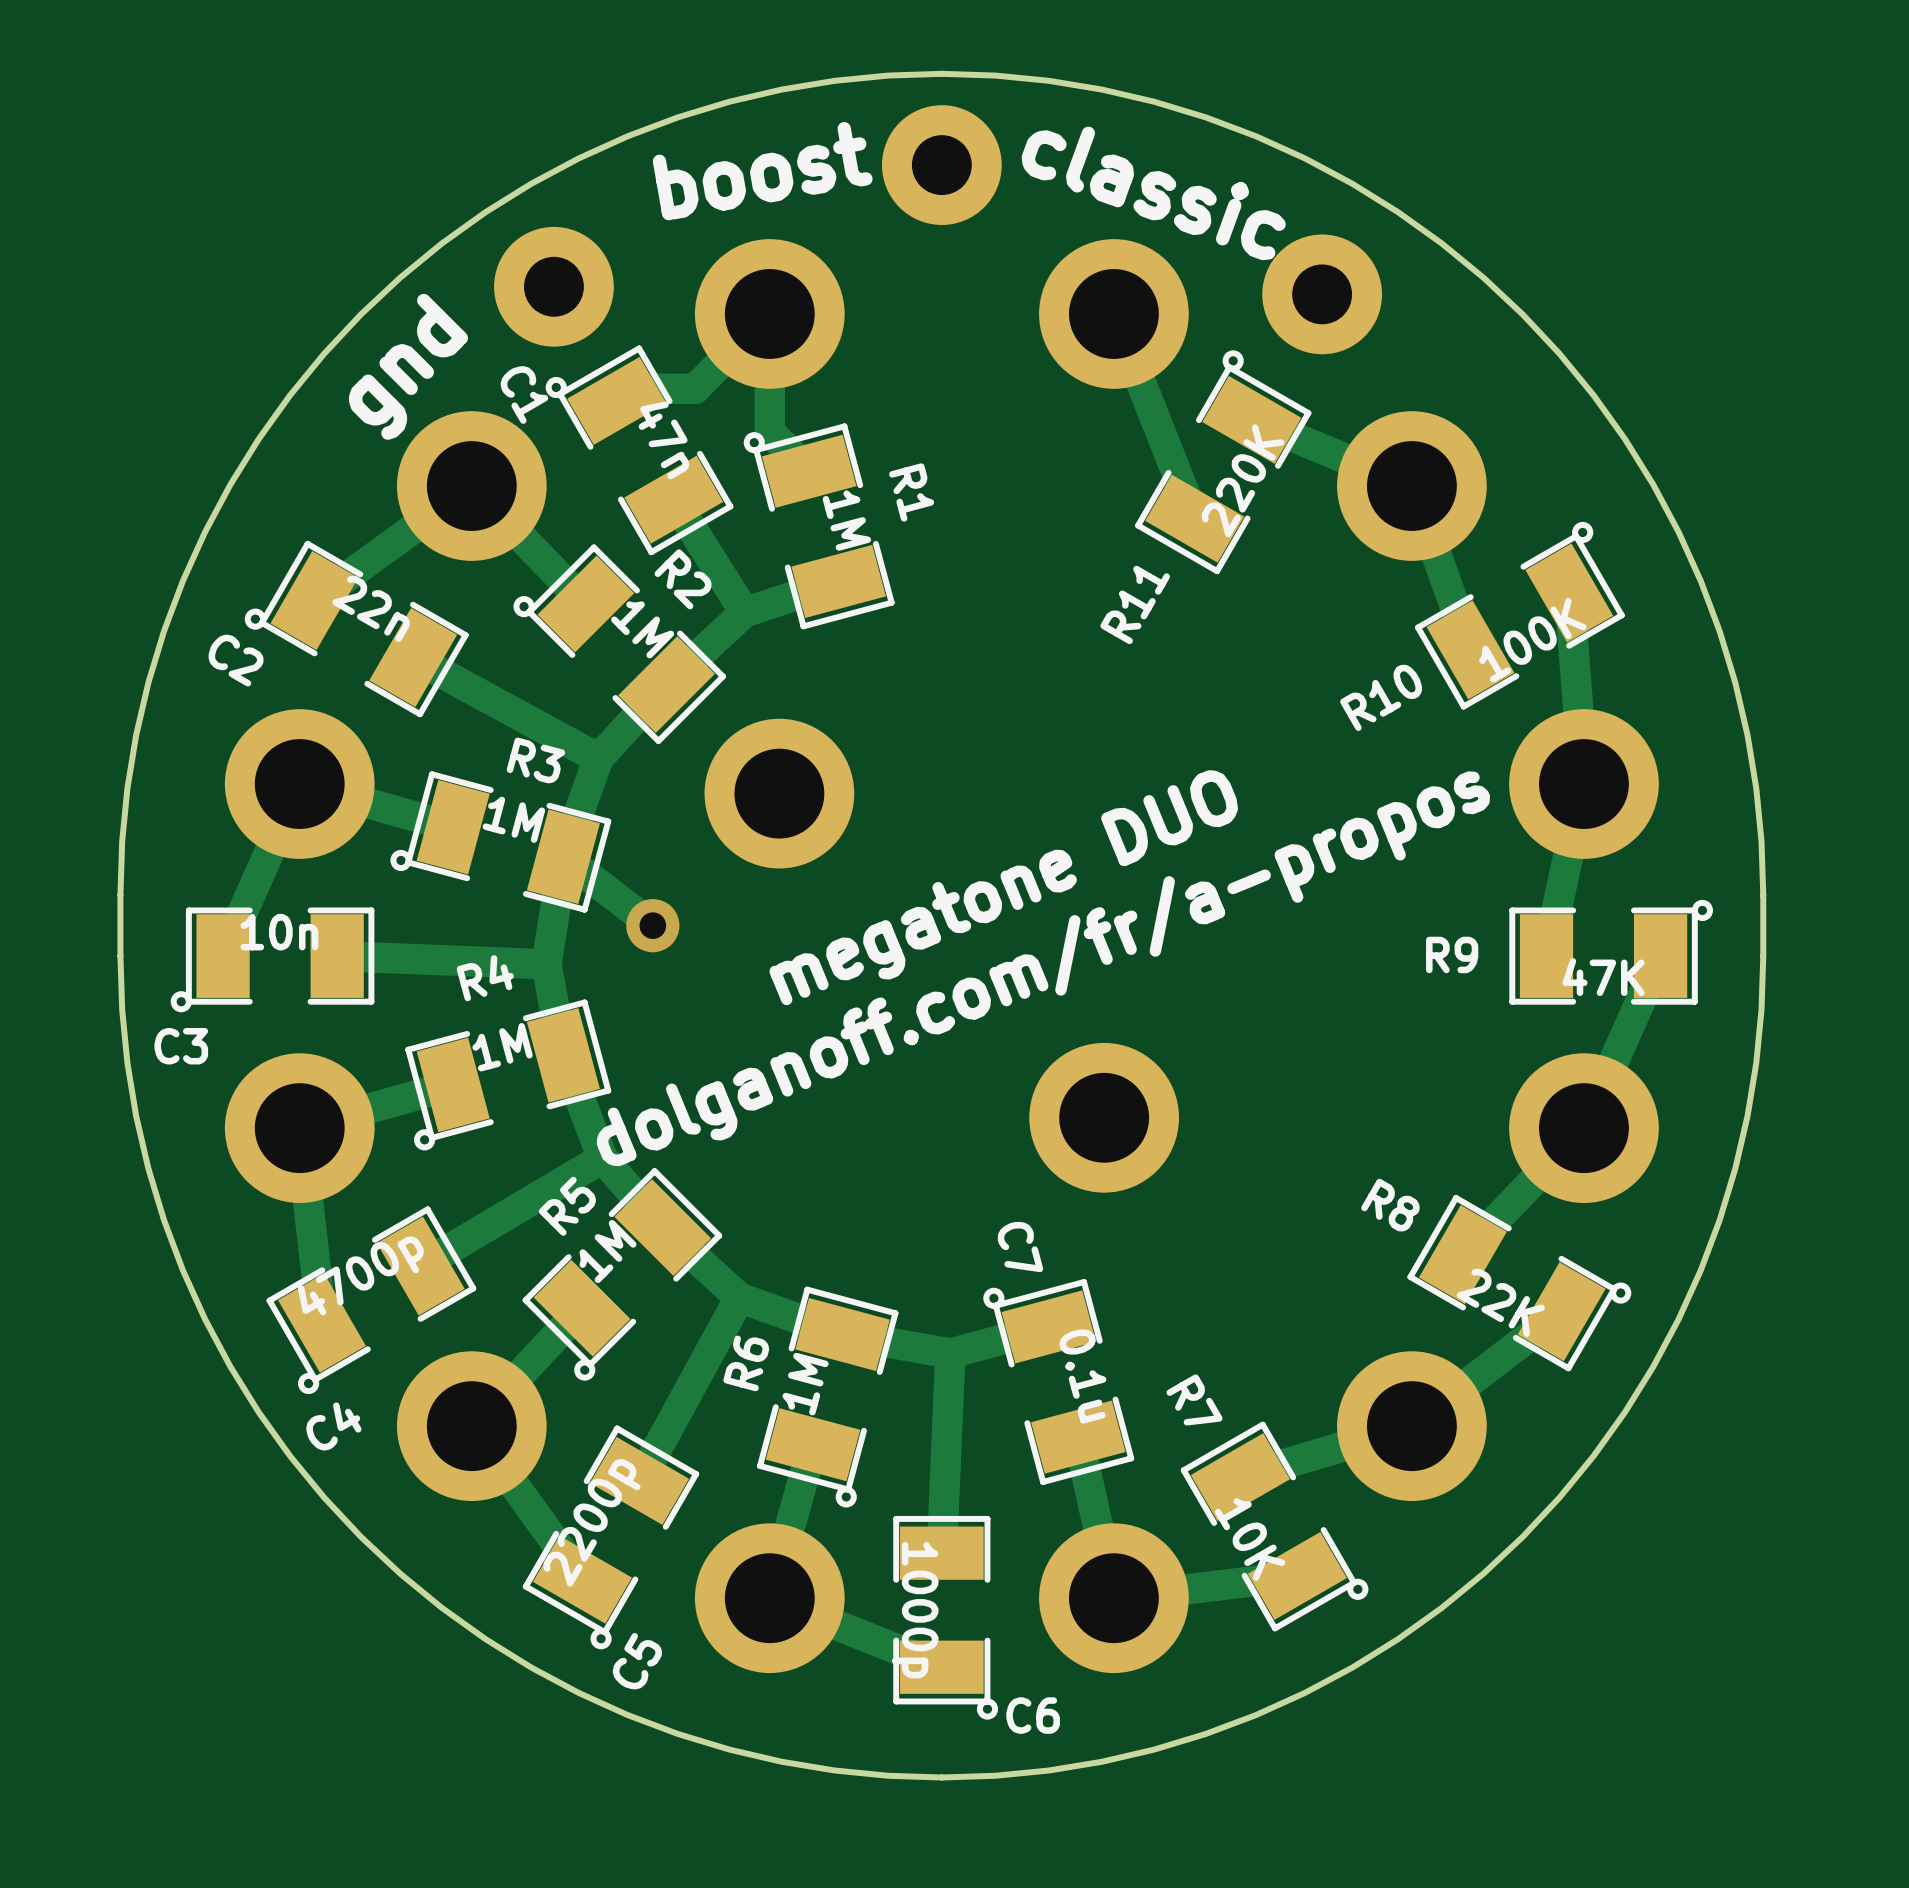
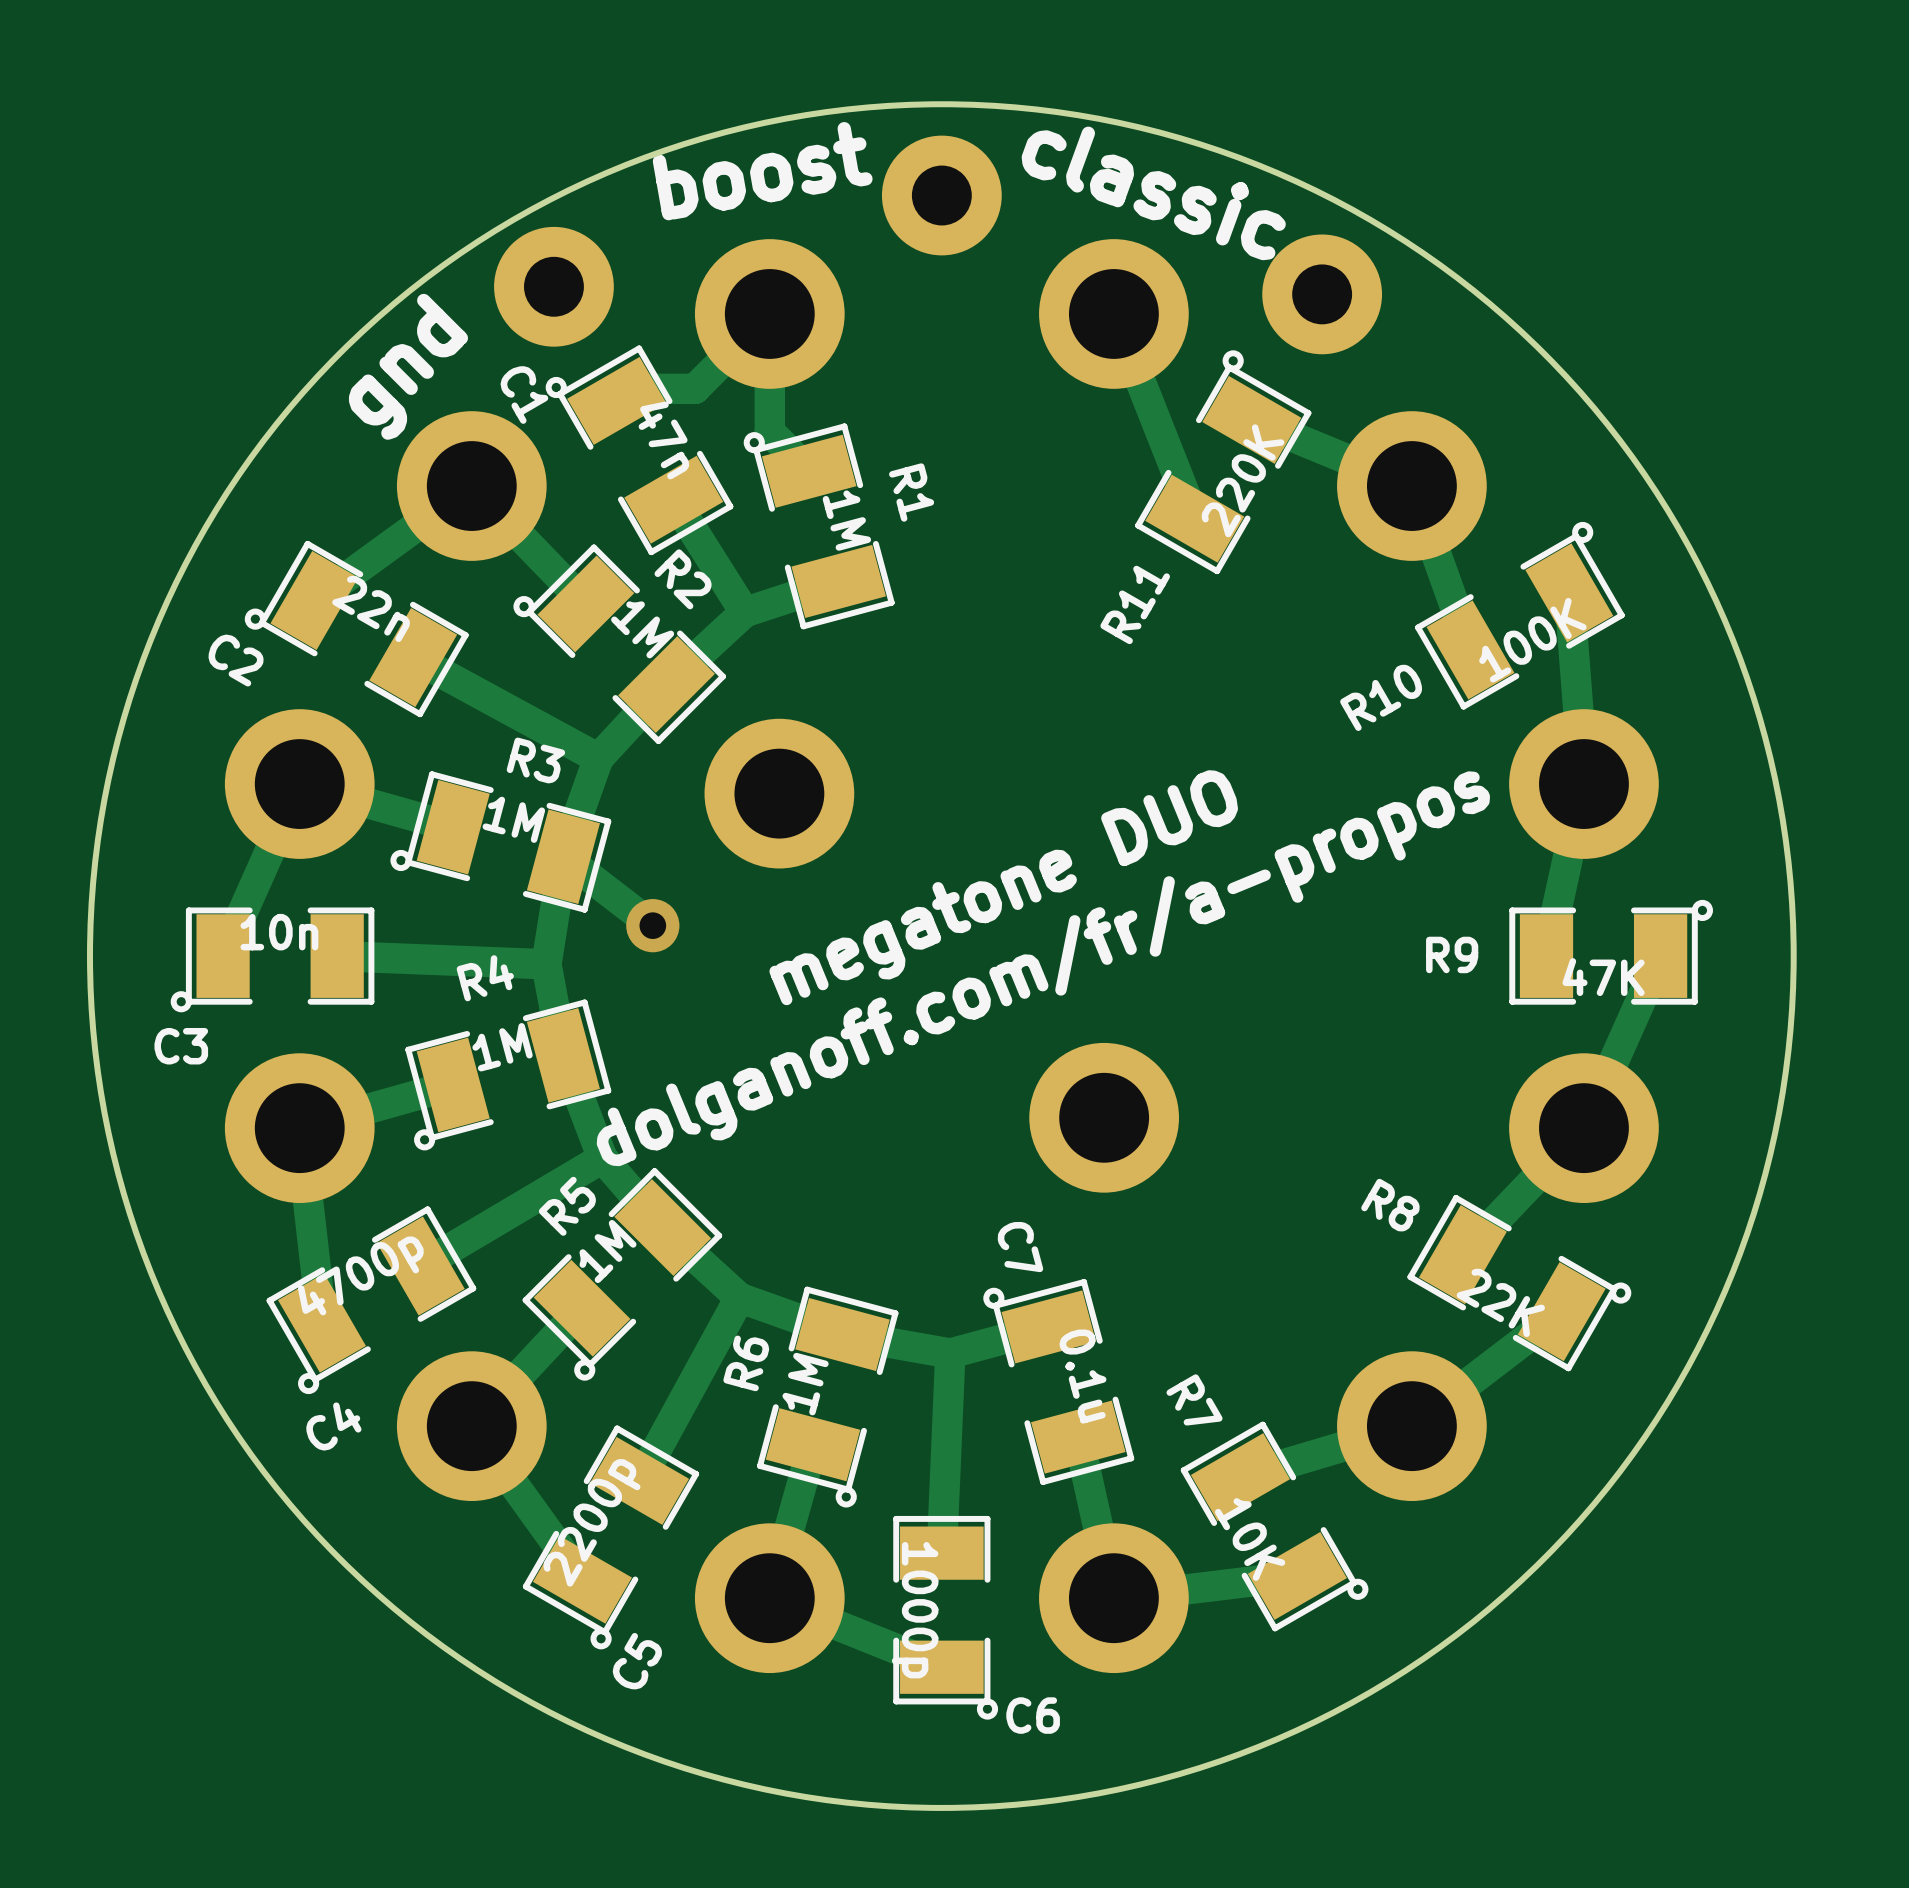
board edge: (941, 73) (888, 75) (834, 80) (781, 89) (729, 101) (677, 117) (627, 136) (578, 158) (531, 183) (485, 212) (441, 243) (400, 277) (361, 314) (324, 353) (290, 395) (258, 438) (230, 484) (205, 531) (182, 580) (164, 631) (148, 682) (136, 734) (127, 788) (122, 841) (120, 895) (122, 1009) (127, 1063) (136, 1116) (148, 1168) (164, 1220) (182, 1270) (205, 1319) (230, 1366) (258, 1412) (290, 1456) (324, 1497) (361, 1536) (400, 1573) (441, 1607) (485, 1639) (531, 1667) (578, 1692) (627, 1714) (677, 1733) (729, 1749) (781, 1761) (834, 1770) (888, 1775) (941, 1777) (995, 1775) (1049, 1770) (1102, 1761) (1154, 1749) (1205, 1733) (1256, 1714) (1305, 1692) (1352, 1667) (1398, 1639) (1441, 1607) (1483, 1573) (1522, 1536) (1559, 1497) (1593, 1456) (1624, 1412) (1653, 1366) (1678, 1319) (1700, 1270) (1719, 1220) (1735, 1168) (1747, 1116) (1756, 1063) (1761, 1009) (1763, 956) (1761, 841) (1756, 788) (1747, 734) (1735, 682) (1719, 631) (1700, 580) (1678, 531) (1653, 484) (1624, 438) (1593, 395) (1559, 353) (1522, 314) (1483, 277) (1441, 243) (1398, 212) (1352, 183) (1305, 158) (1256, 136) (1205, 117) (1154, 101) (1102, 89) (1049, 80) (995, 75) (941, 73) -> none
round board edge: none -> [87, 101, 1797, 1811]
part position: (941, 165) -> (941, 195)

